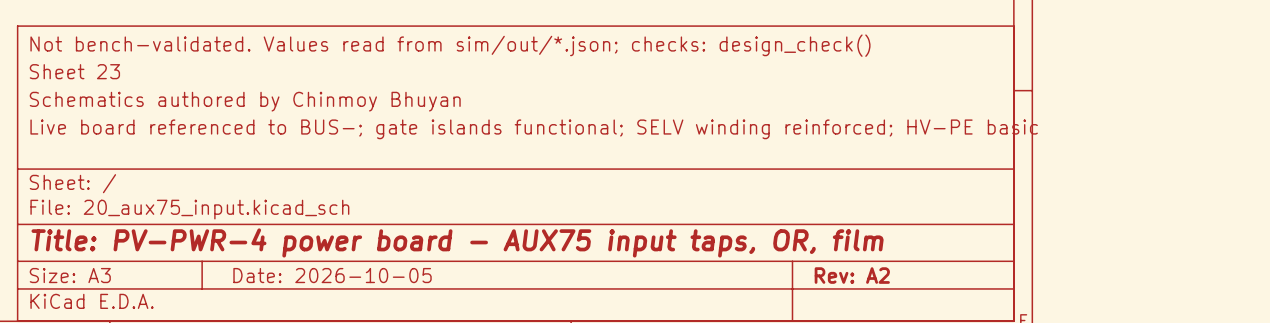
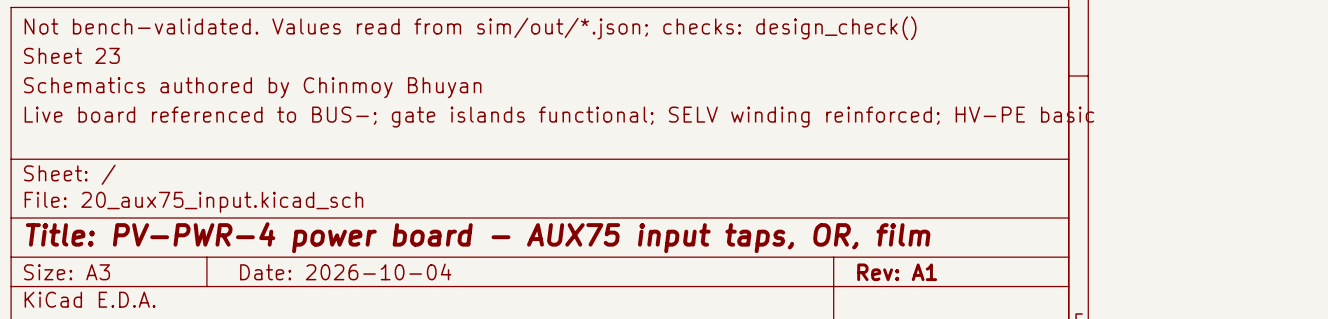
title block: Date: 2026-10-05 (332, 275) -> Date: 2026-10-04 (345, 271)
title block: Rev: A2 (852, 275) -> Rev: A1 (897, 272)

